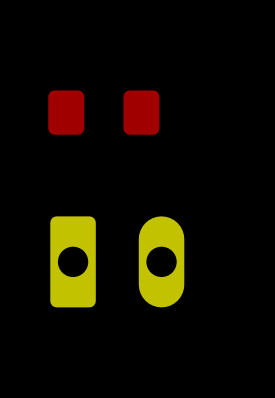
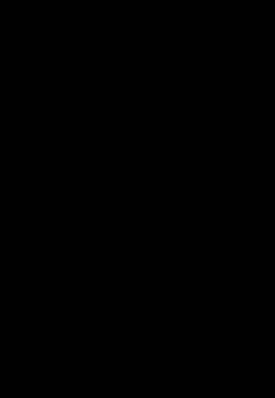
part: (103, 112) -> none
part: (117, 261) -> none

